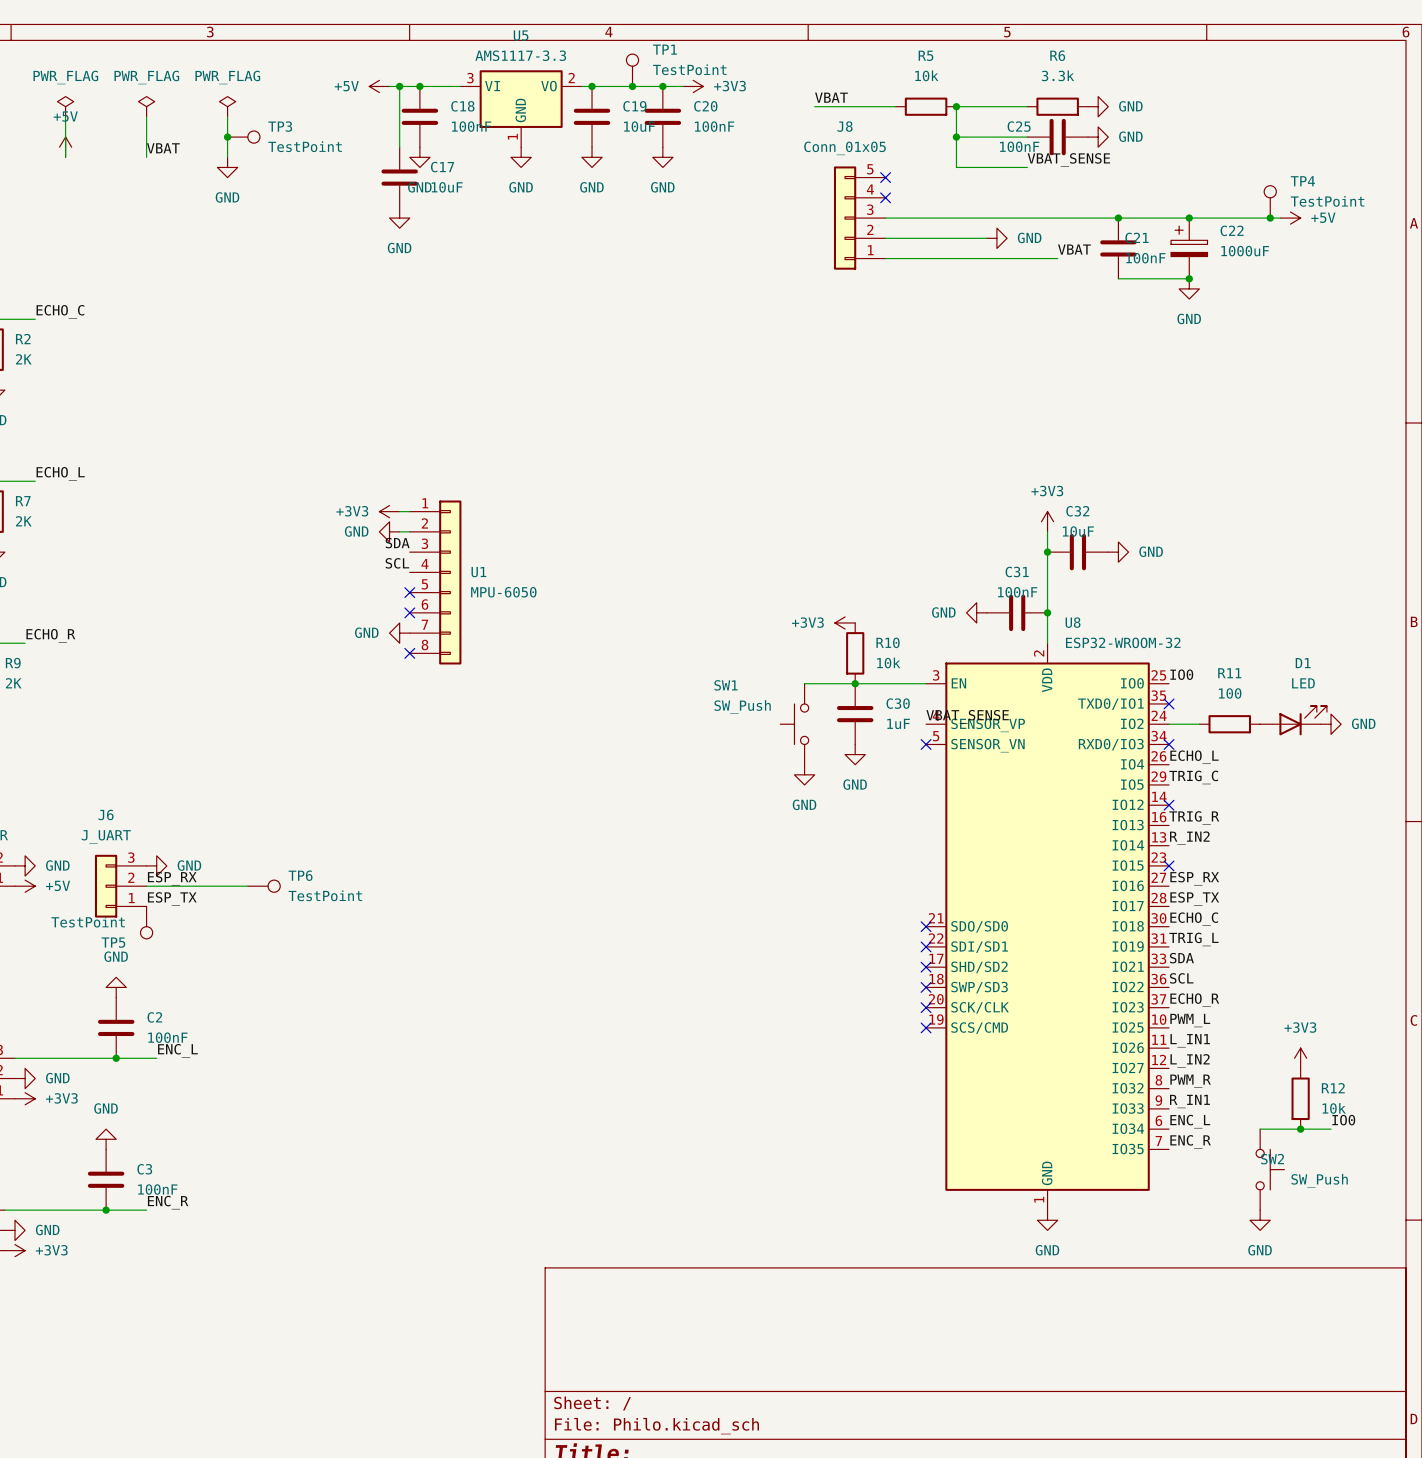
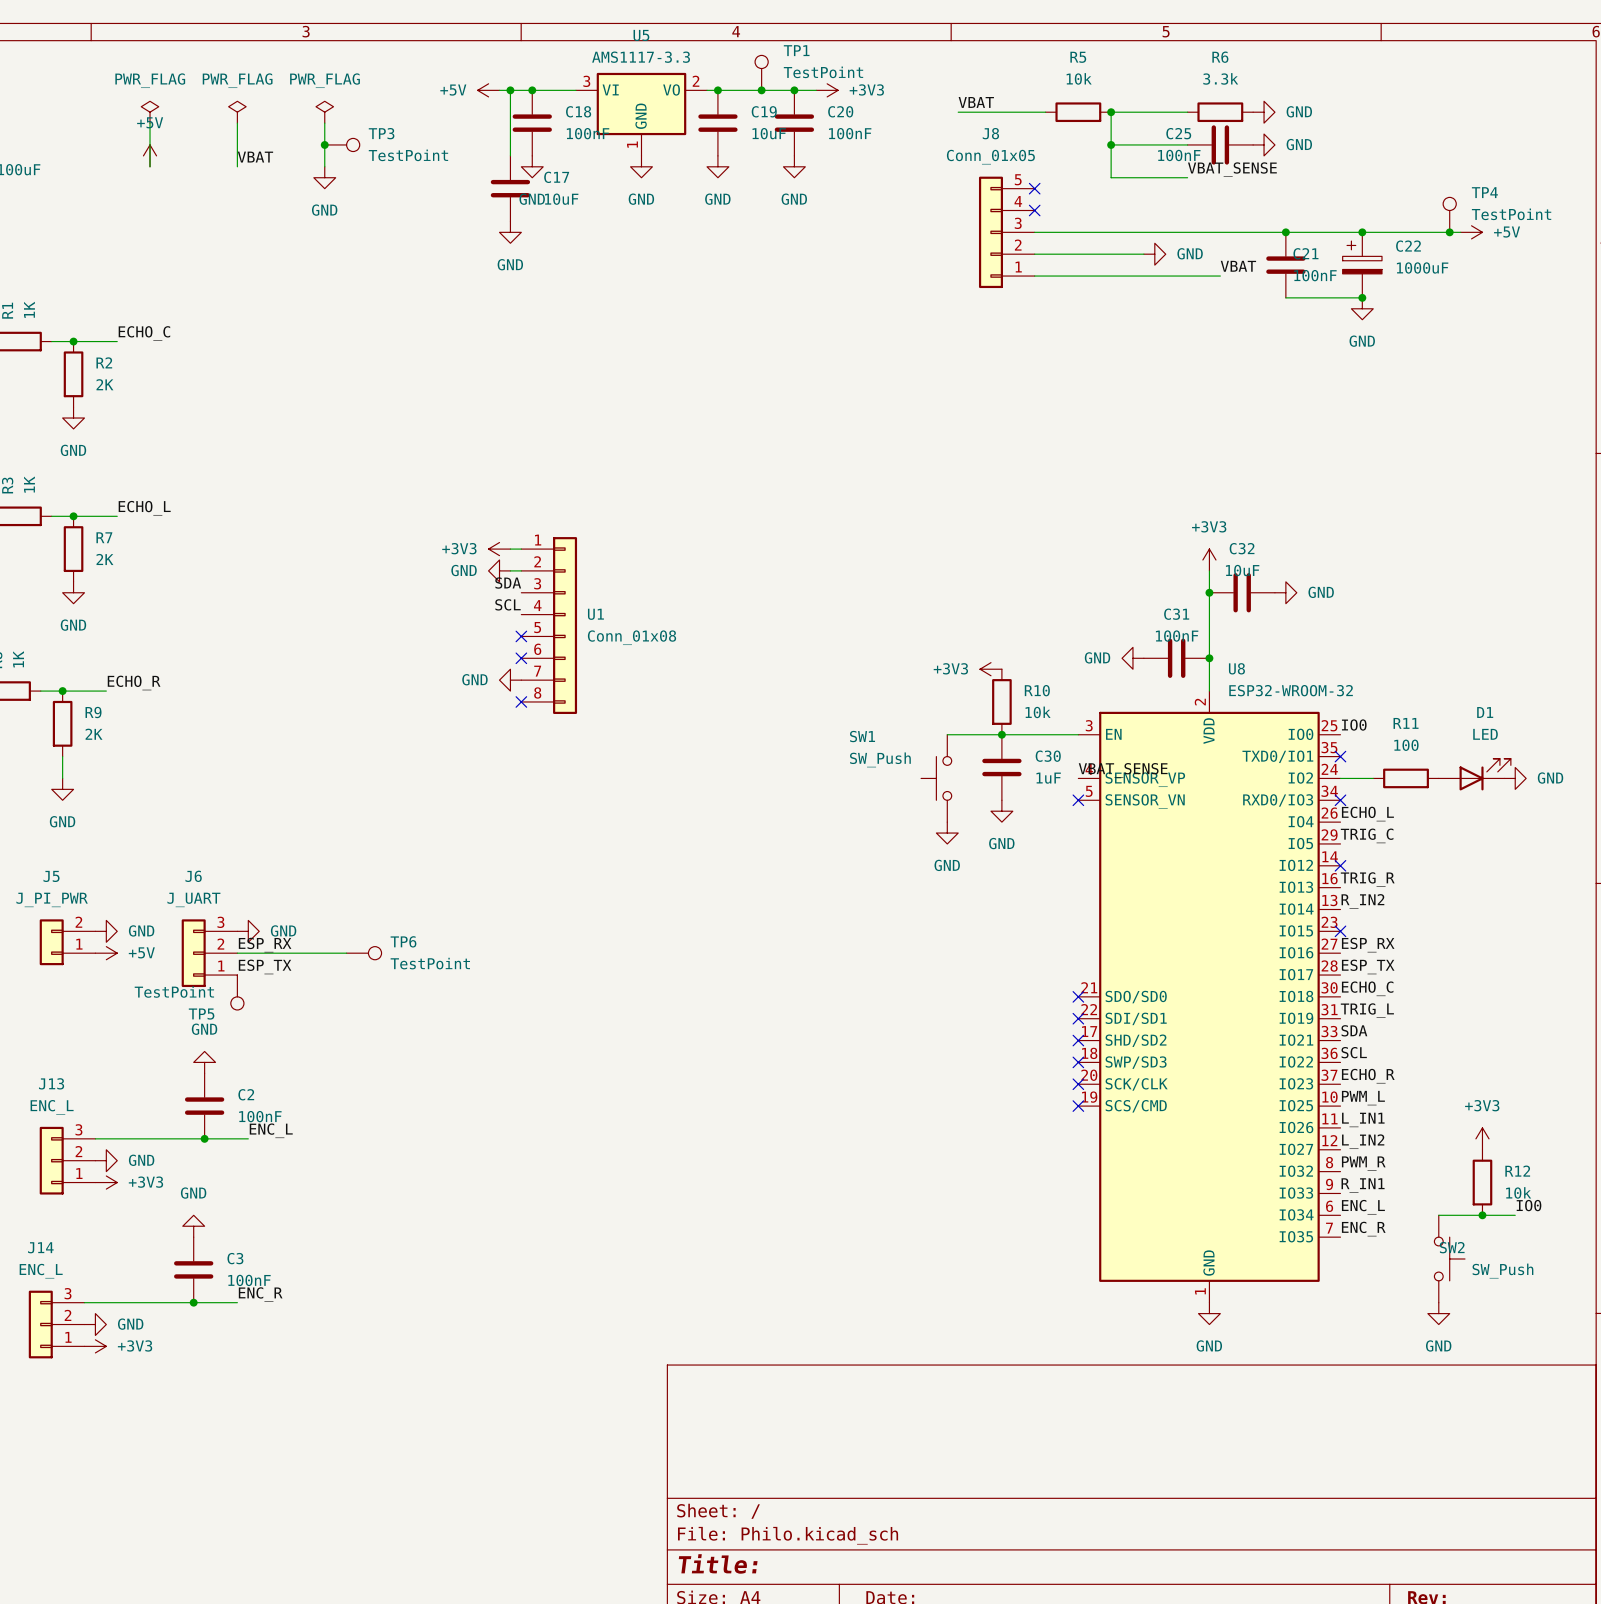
U1 value: MPU-6050 (503, 592) -> Conn_01x08 (632, 637)

